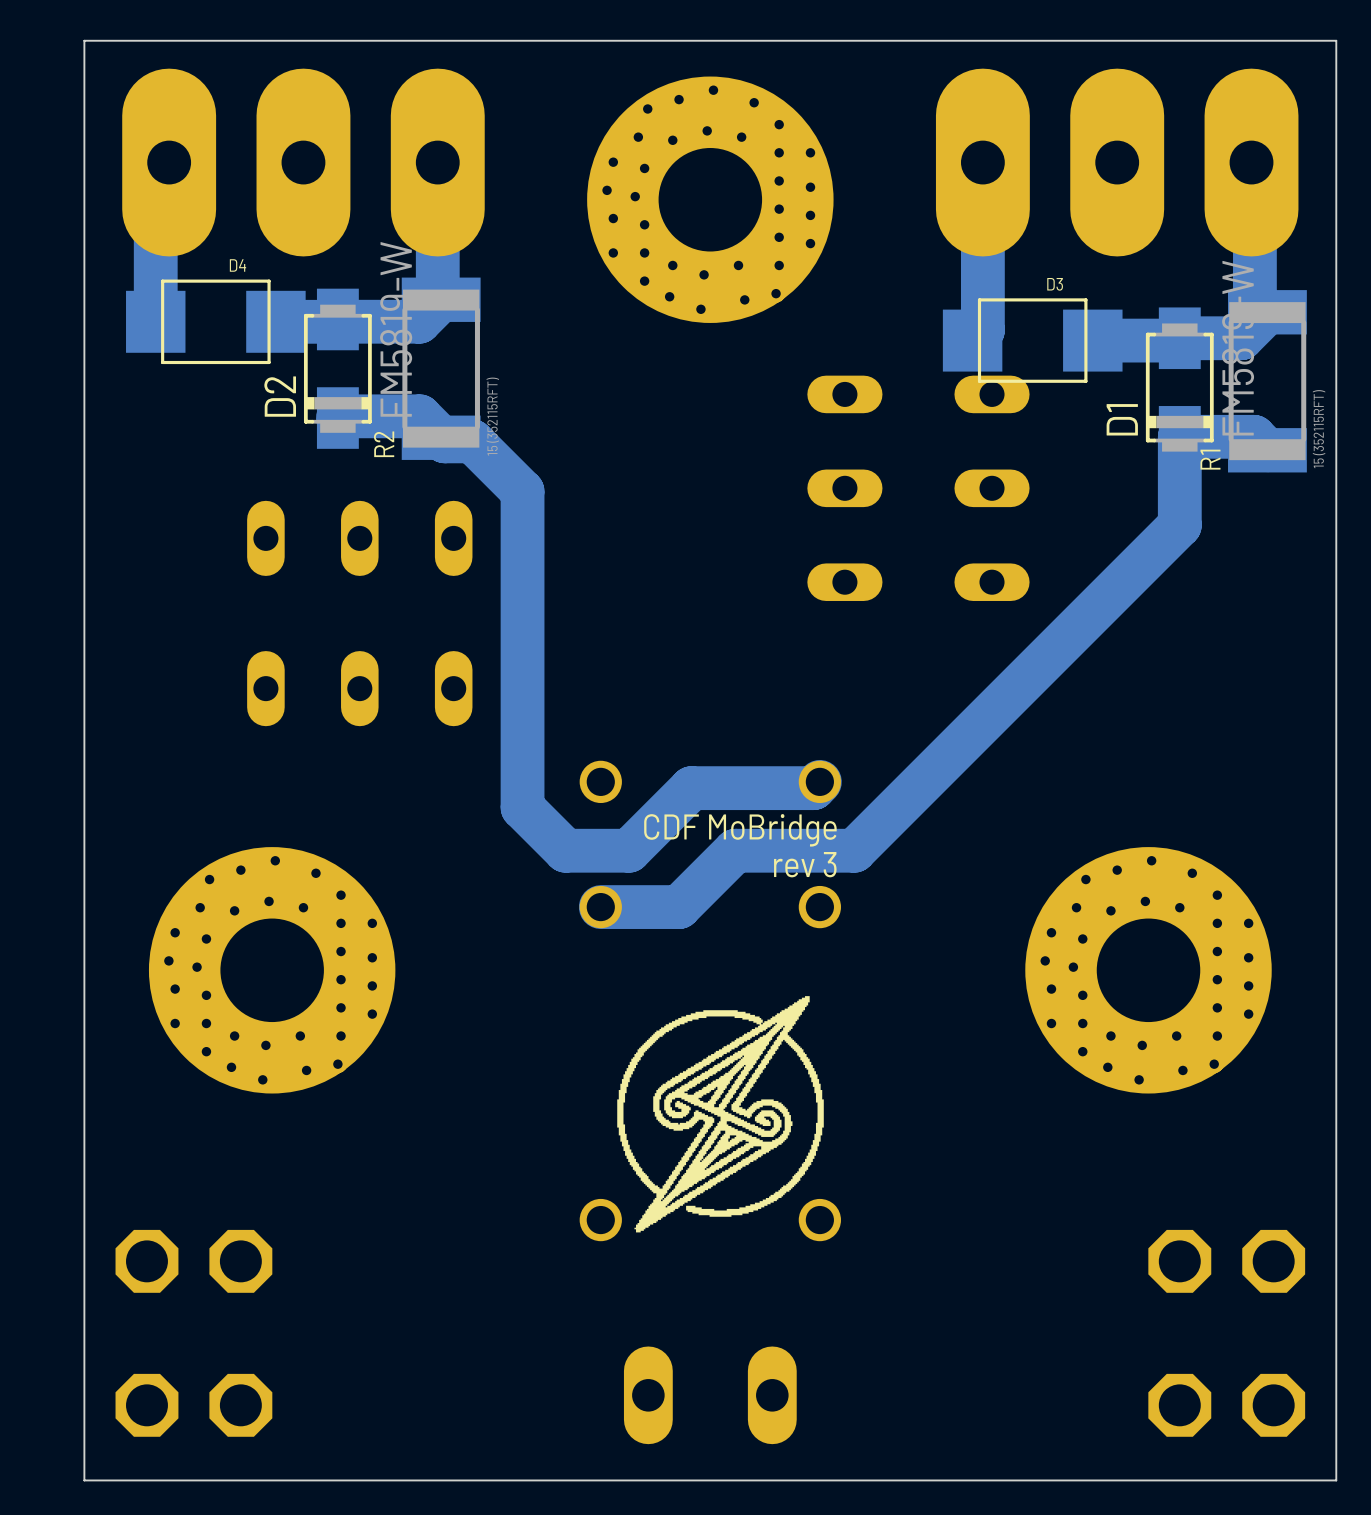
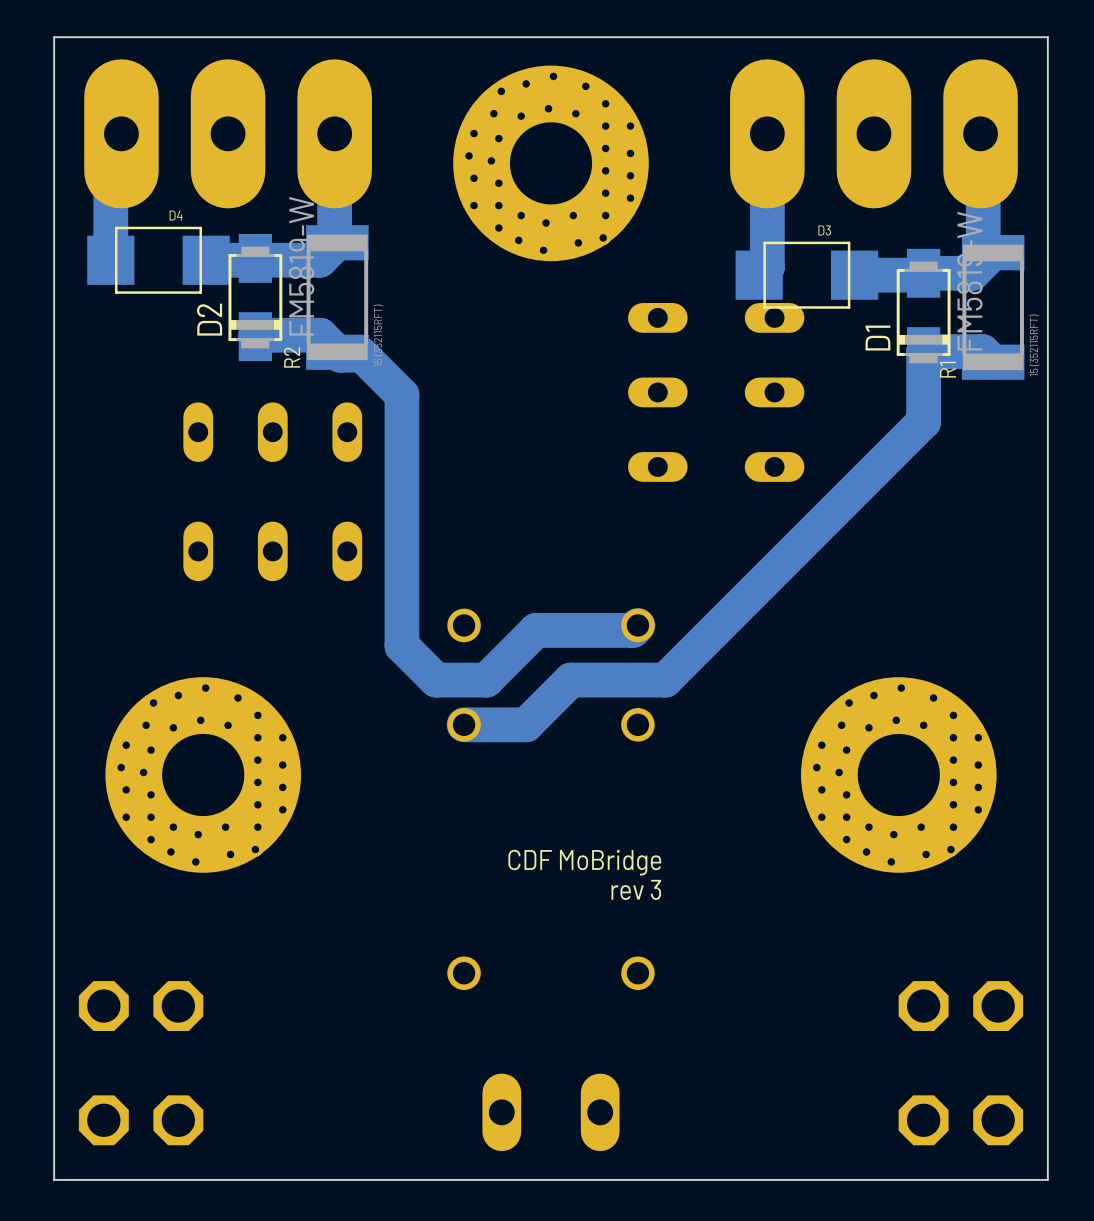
text position: CDF MoBridge (740, 830) -> CDF MoBridge (584, 862)
text position: rev 3 (805, 864) -> rev 3 (636, 889)
drawing: [617, 996, 824, 1233] -> none

